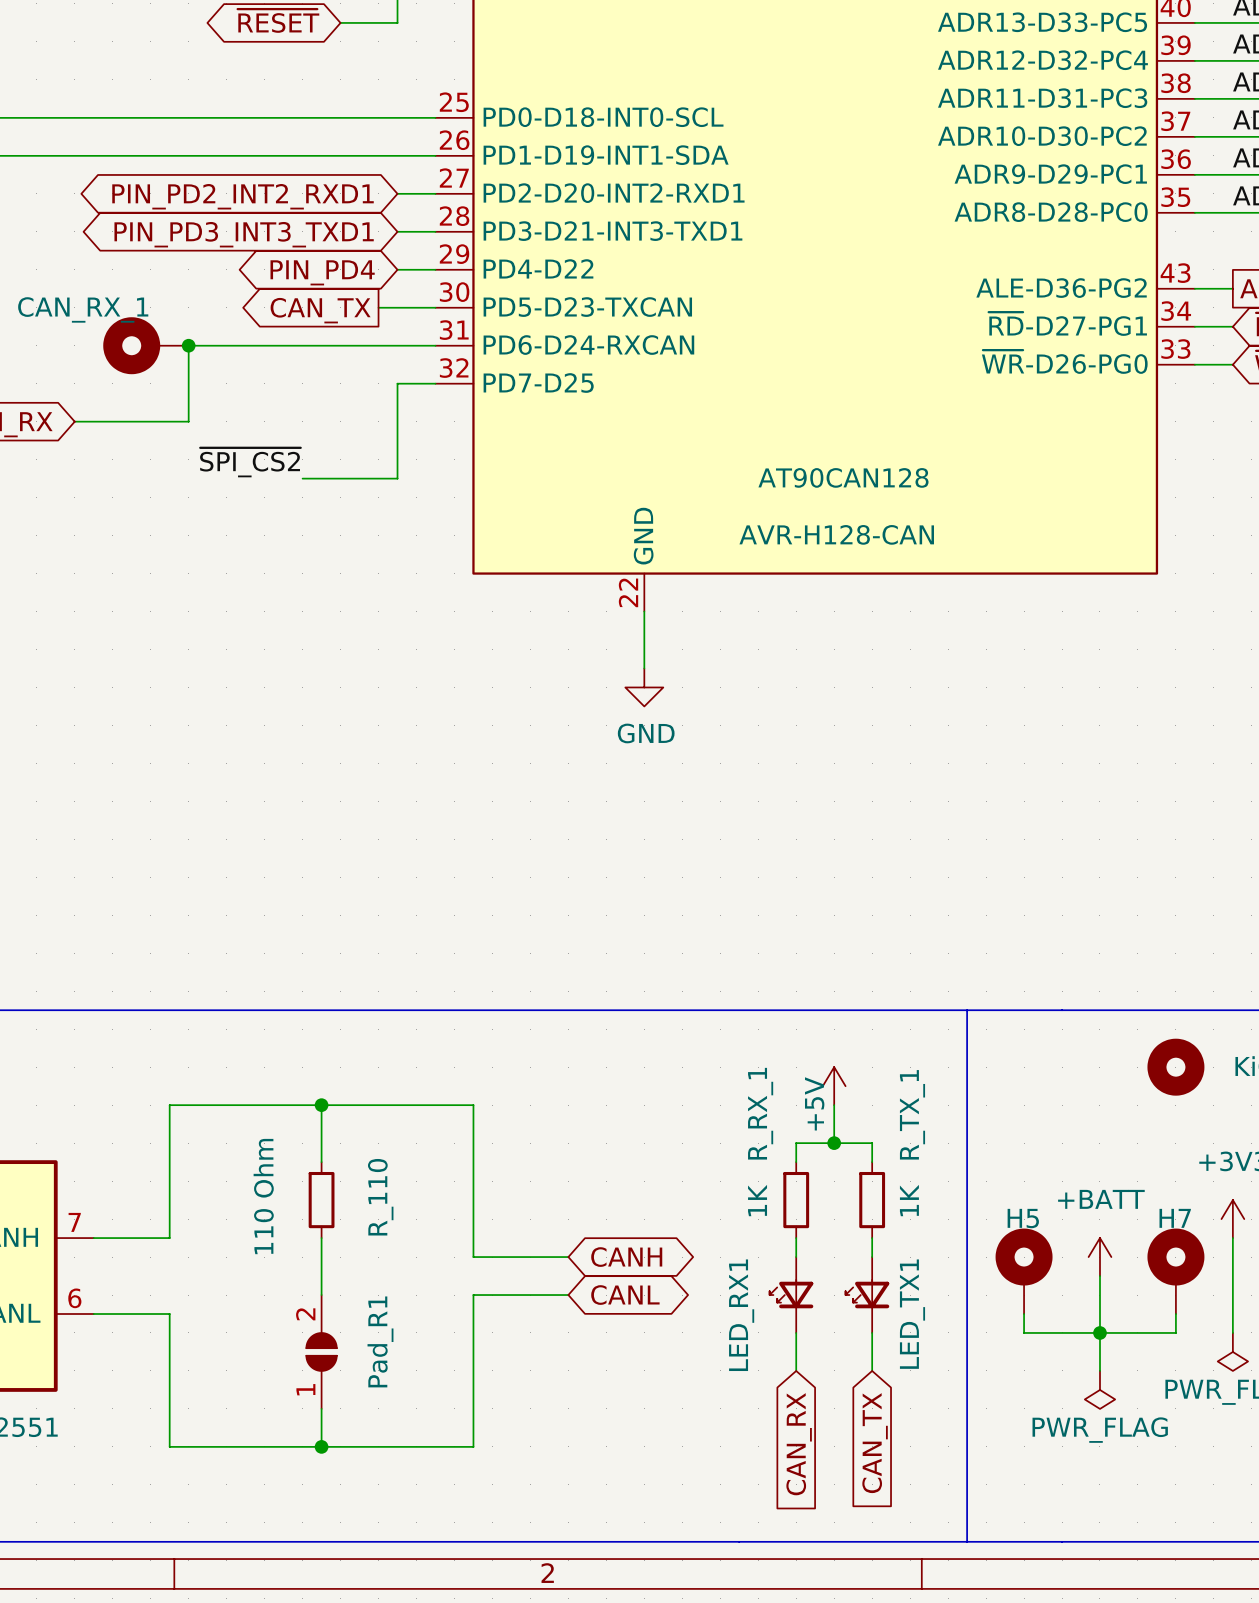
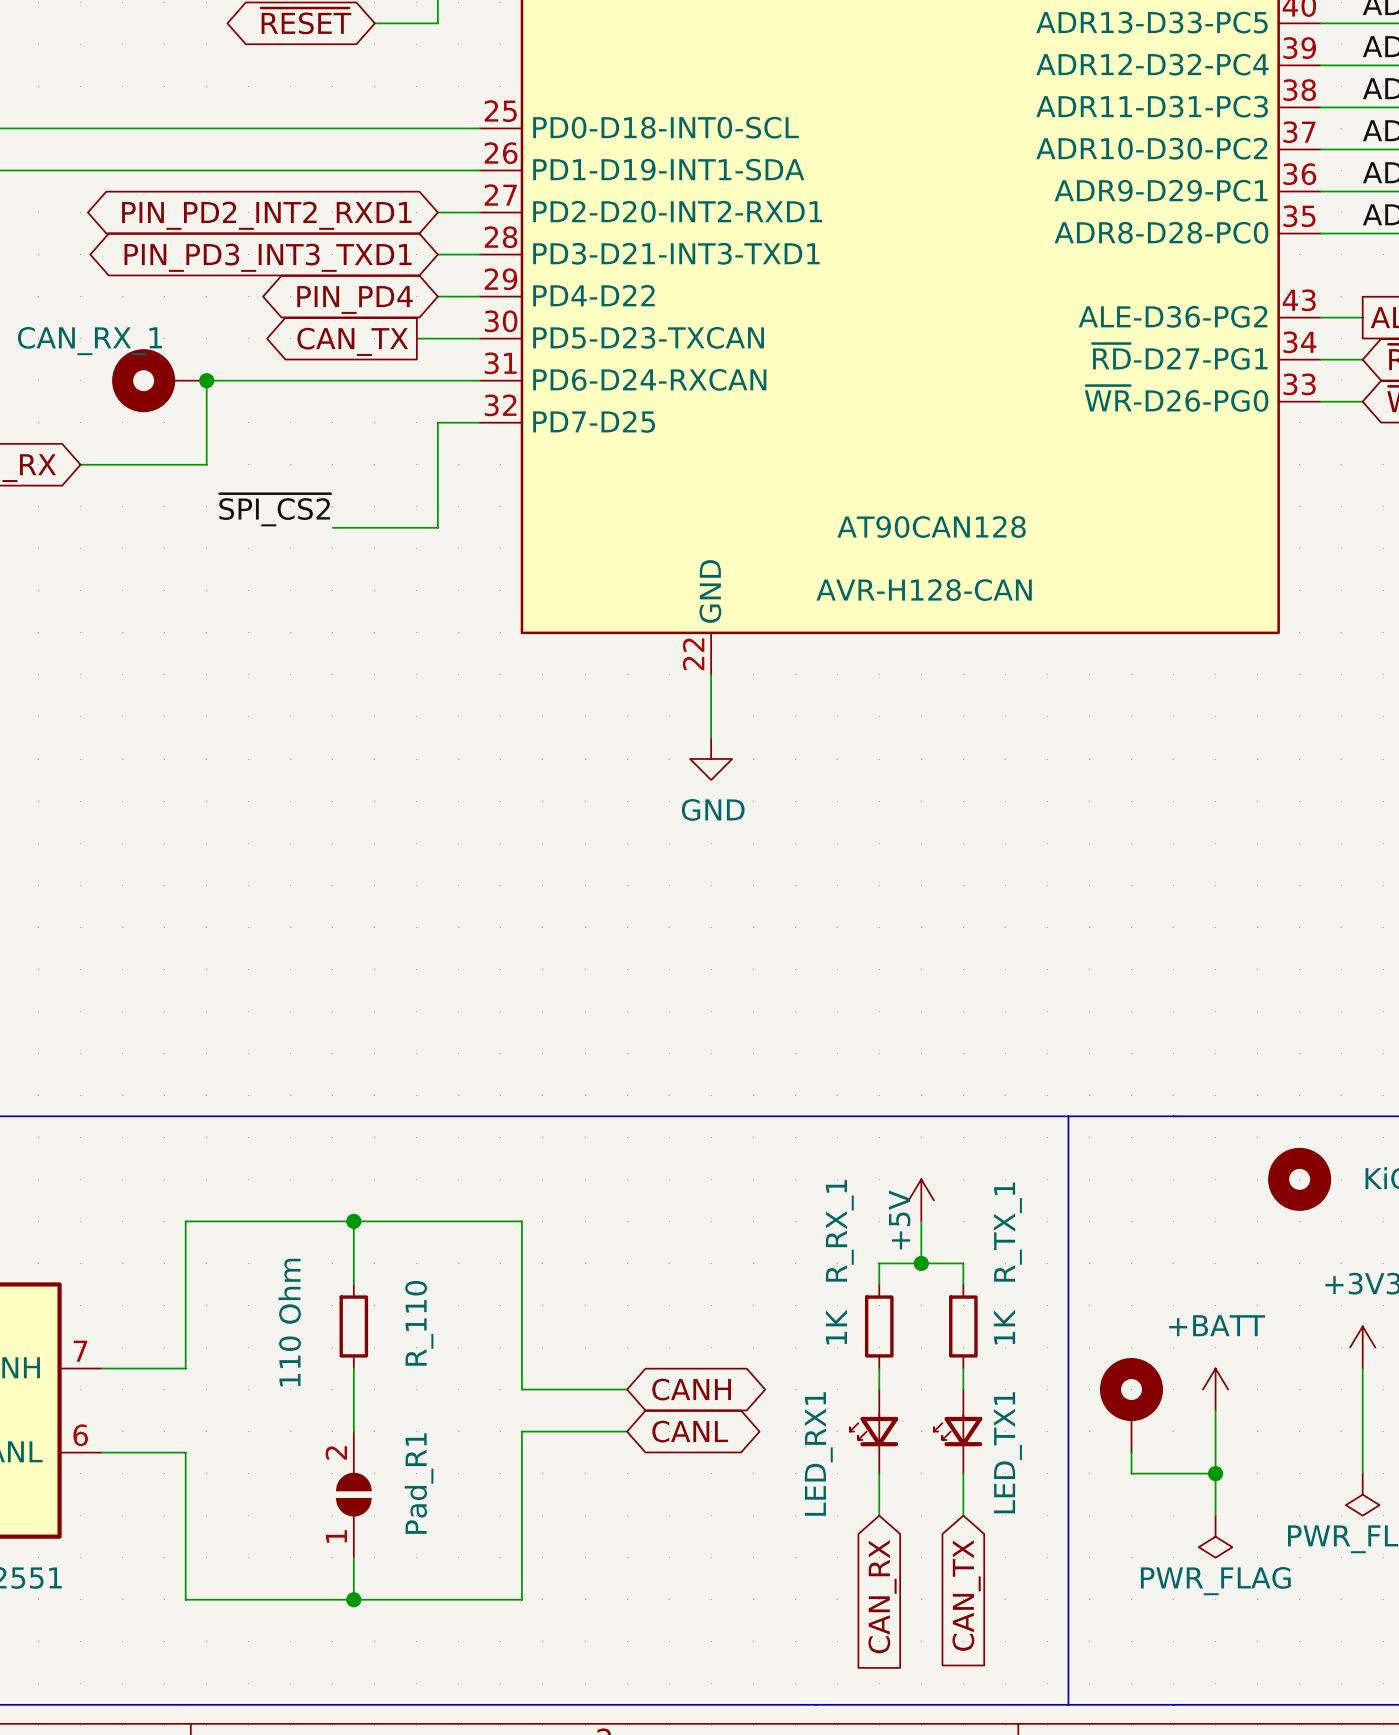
H5 name: H5 (1023, 1218) -> none
H7: (1175, 1271) -> none
wire: (1175, 1313) (1175, 1332) (1099, 1332) -> none

